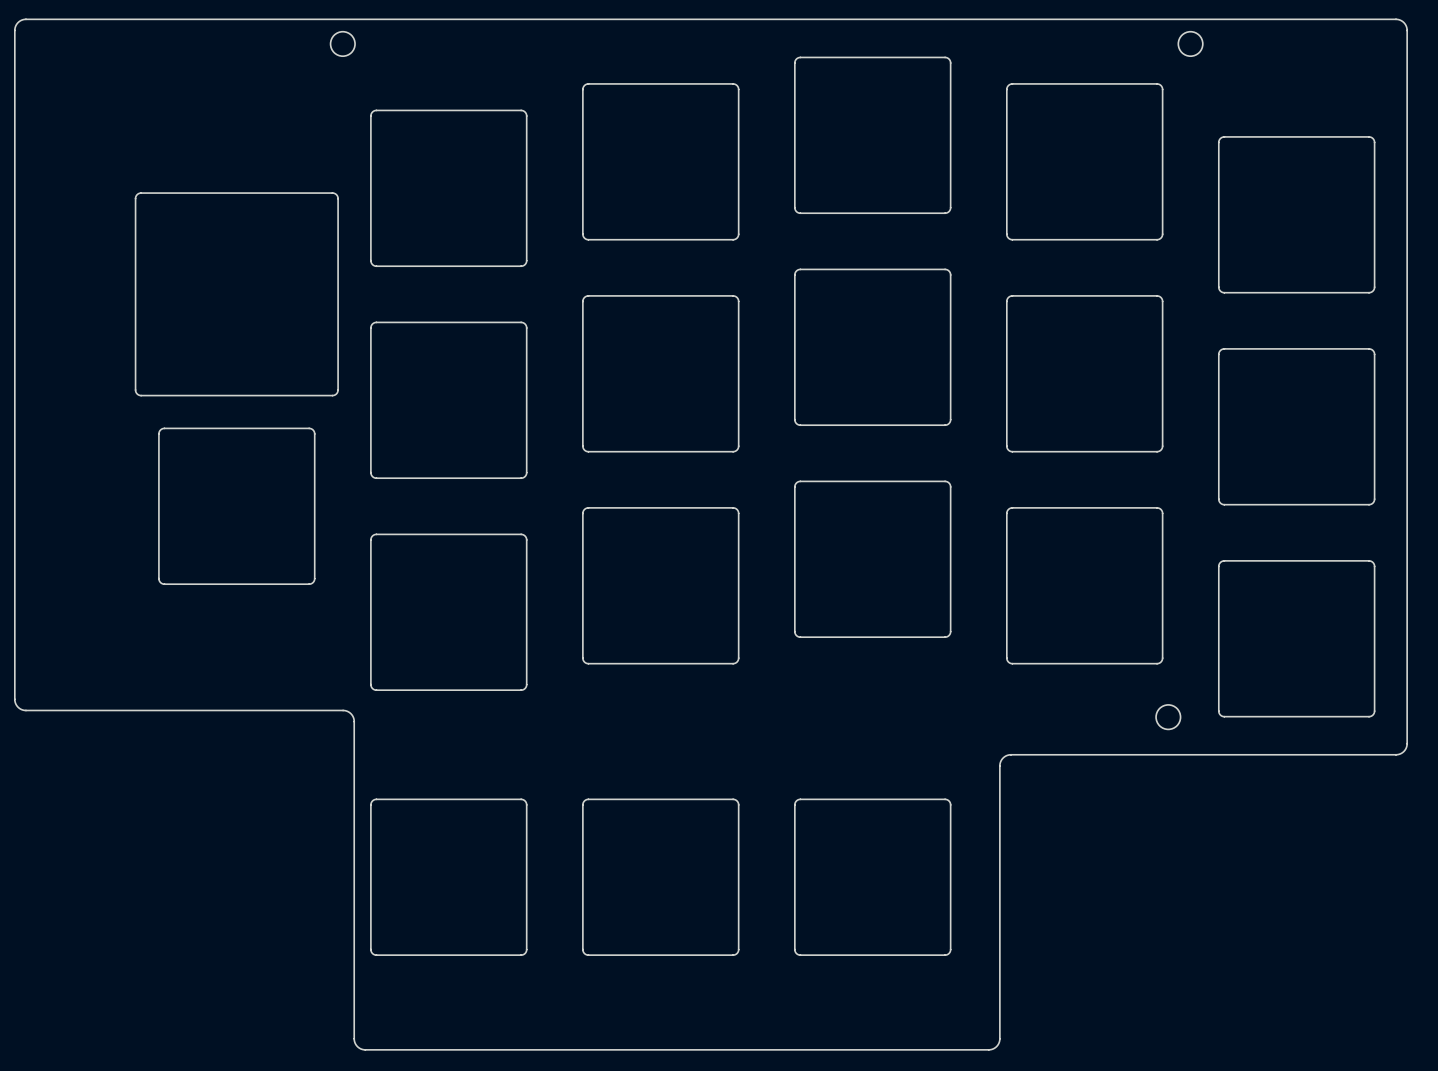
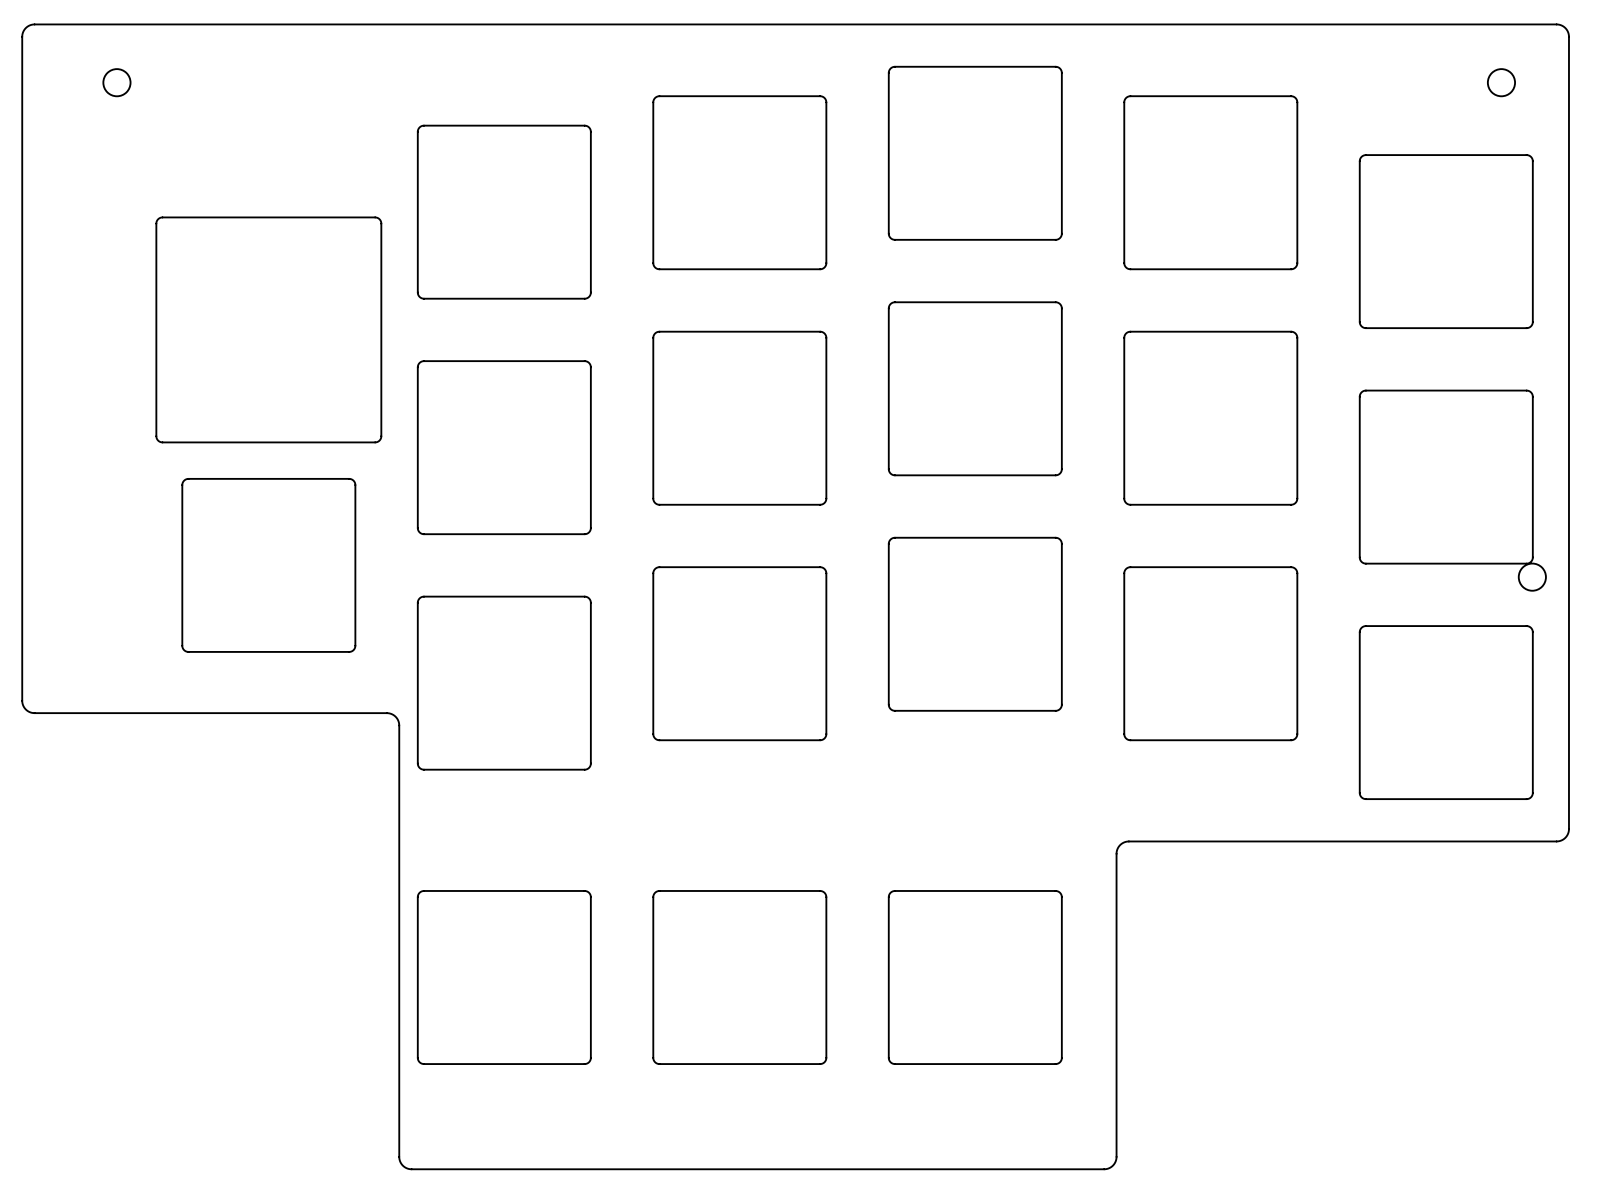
round board edge position: (342, 43) -> (116, 82)
round board edge position: (1190, 43) -> (1501, 82)
round board edge: none -> [1517, 562, 1547, 592]
board edge: (14, 628) (14, 700) (17, 706) (23, 710) (343, 710) (350, 713) (354, 721) -> (22, 700) (25, 709) (34, 713) (389, 713) (395, 716) (399, 724) (399, 804)
round board edge: [1155, 704, 1182, 731] -> none

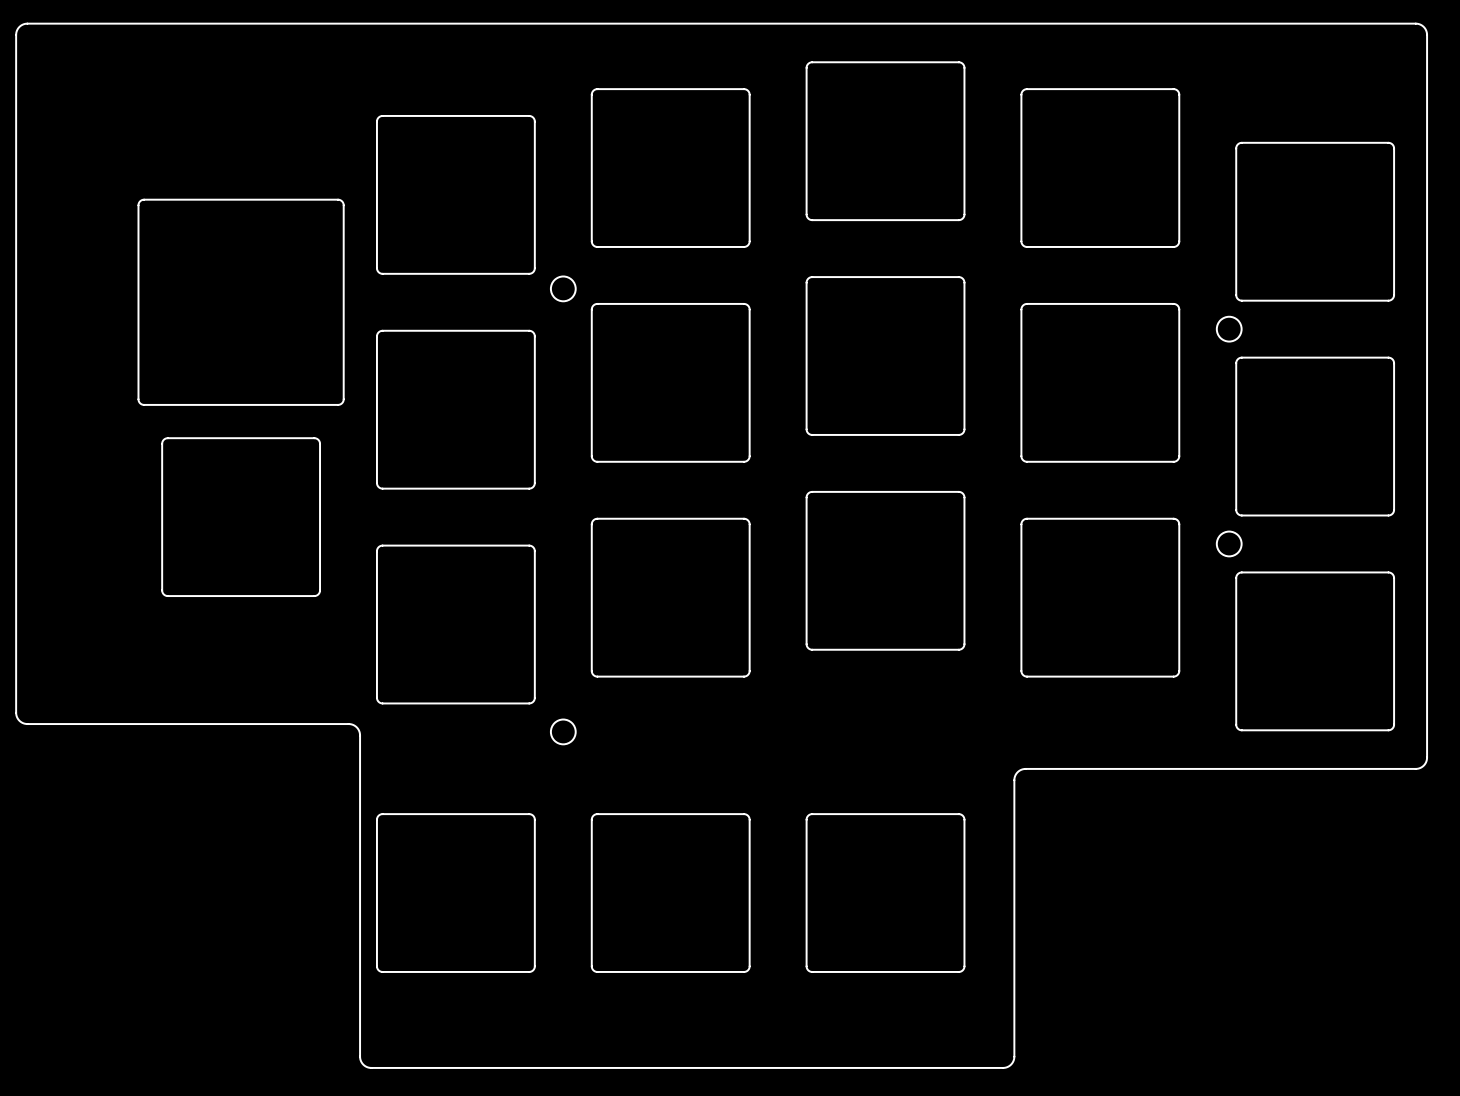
round board edge: [102, 68, 132, 98] -> none
round board edge: [1486, 68, 1516, 98] -> none
round board edge: none -> [550, 275, 577, 303]
round board edge: none -> [1215, 315, 1243, 343]
round board edge: [1517, 562, 1547, 592] -> none
round board edge: none -> [1215, 530, 1243, 558]
board edge: (22, 700) (25, 709) (34, 713) (389, 713) (395, 716) (399, 724) (399, 804) -> (16, 640) (16, 714) (18, 719) (24, 723) (348, 724) (356, 727) (360, 735)
round board edge: none -> [550, 718, 577, 746]

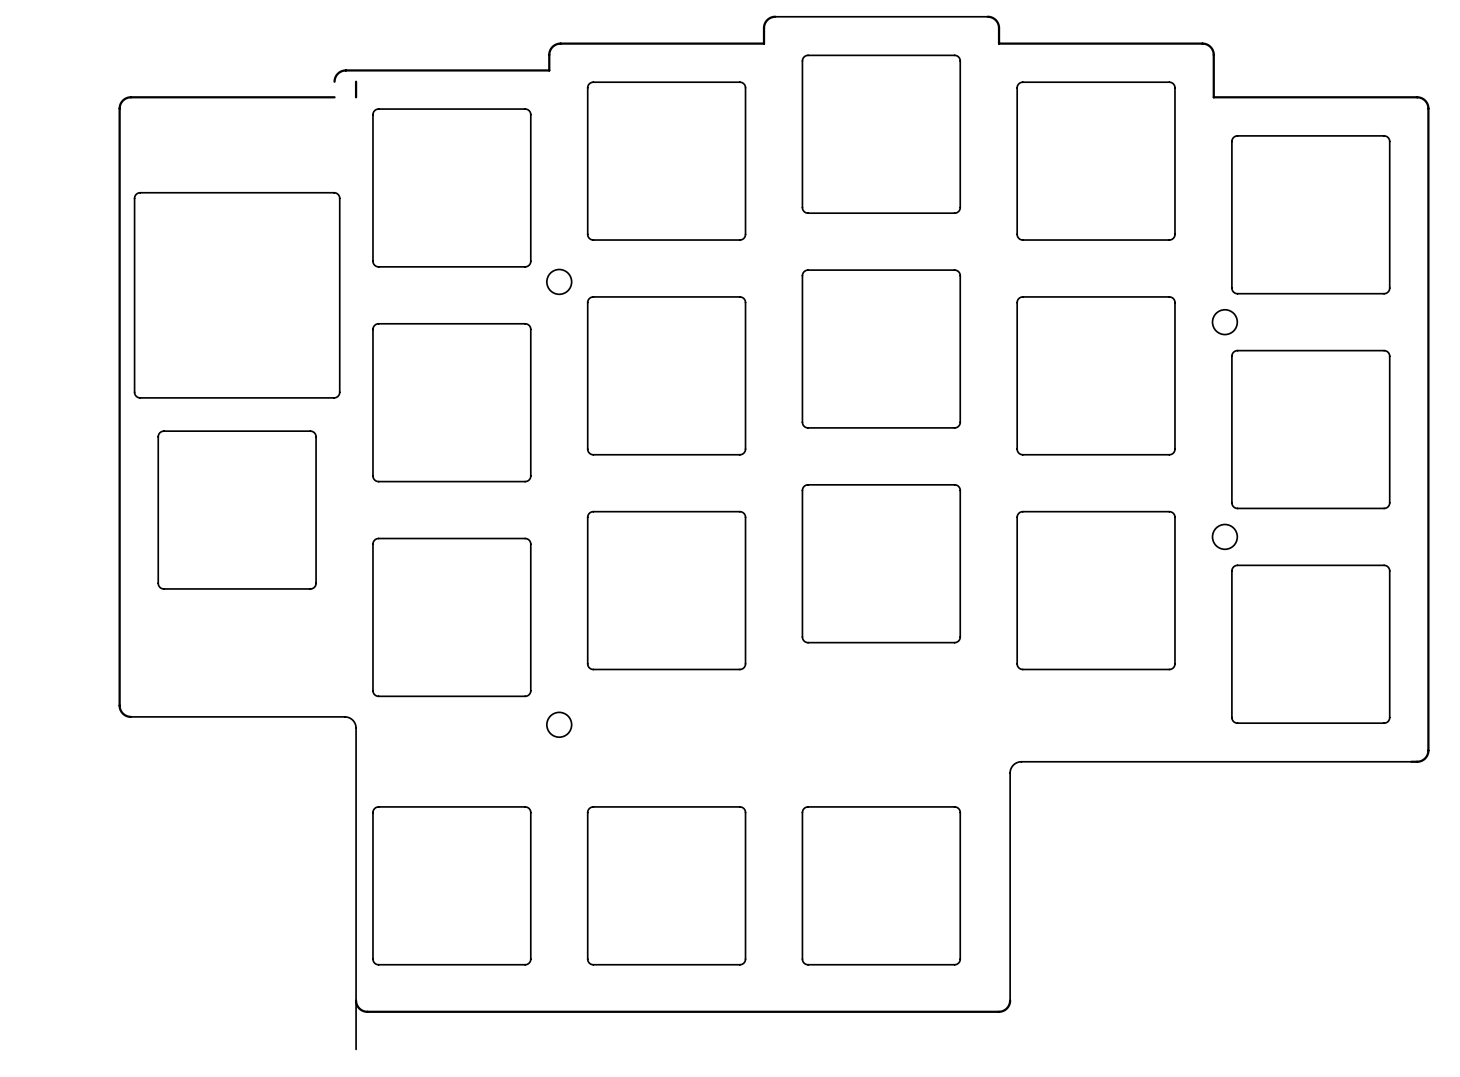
board edge: (779, 23) (27, 23) (19, 26) (16, 34) (16, 714) (19, 720) (26, 723) (134, 724) -> (334, 97) (130, 97) (123, 99) (120, 104) (119, 705) (122, 713) (130, 716)
board edge: none -> (775, 16) (769, 18) (765, 23) (764, 43) (559, 43) (553, 46) (549, 51) (549, 70) (345, 70) (337, 73) (334, 81)
board edge: (991, 23) (1415, 23) (1425, 28) (1427, 34) (1427, 757) (1423, 765) (1415, 768) -> (987, 16) (993, 18) (997, 23) (999, 43) (1206, 44) (1211, 47) (1213, 53) (1213, 97) (1417, 97) (1426, 102) (1428, 108) (1428, 750) (1423, 760) (1411, 761)
board edge: none -> (356, 81) (356, 97)
board edge: (1014, 1007) (1014, 1057) (1011, 1064) (1004, 1067) (371, 1067) (363, 1064) (360, 1056) -> (1010, 1000) (1006, 1008) (998, 1011) (367, 1011) (359, 1008) (356, 1000)

